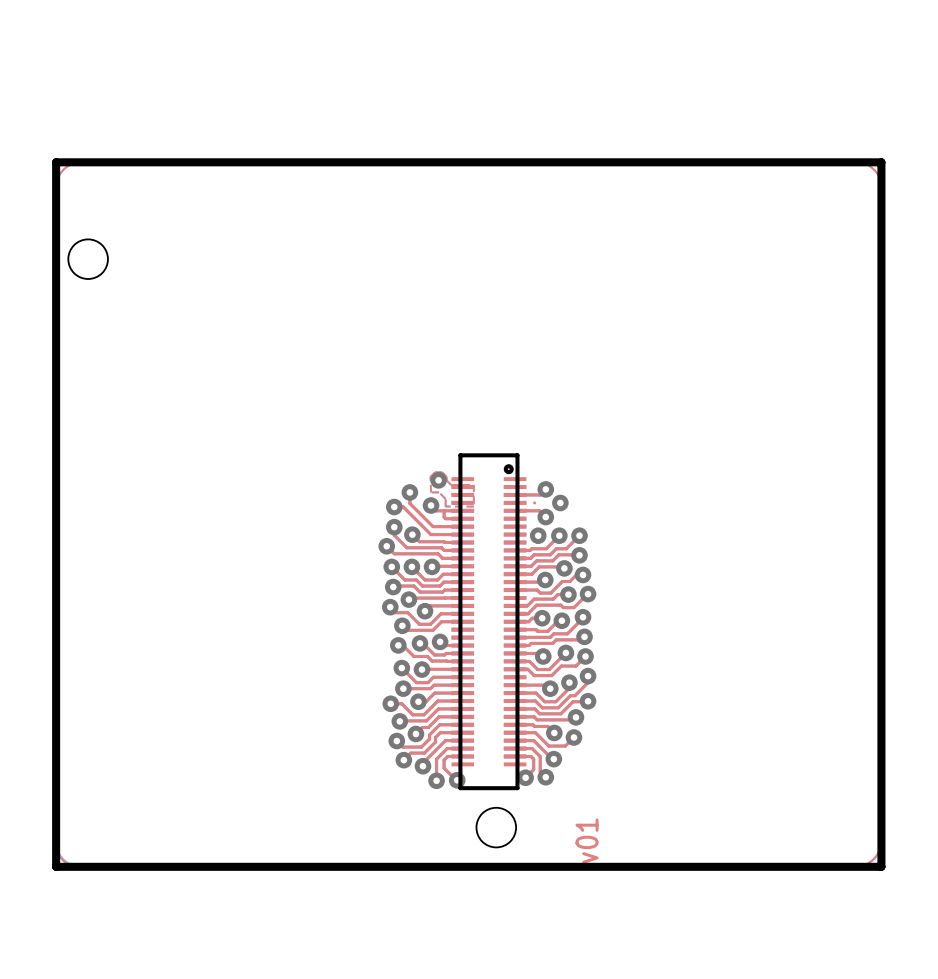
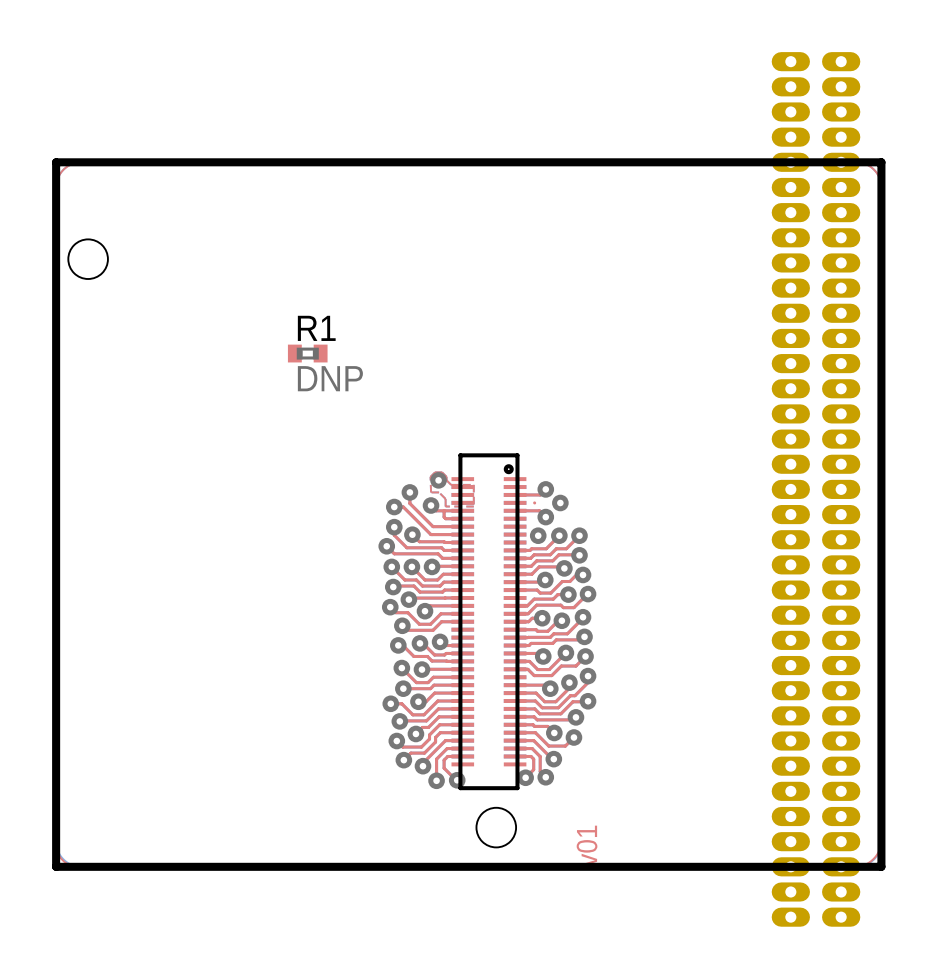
R1: none -> DNP (307, 353)
part: none -> (816, 489)

